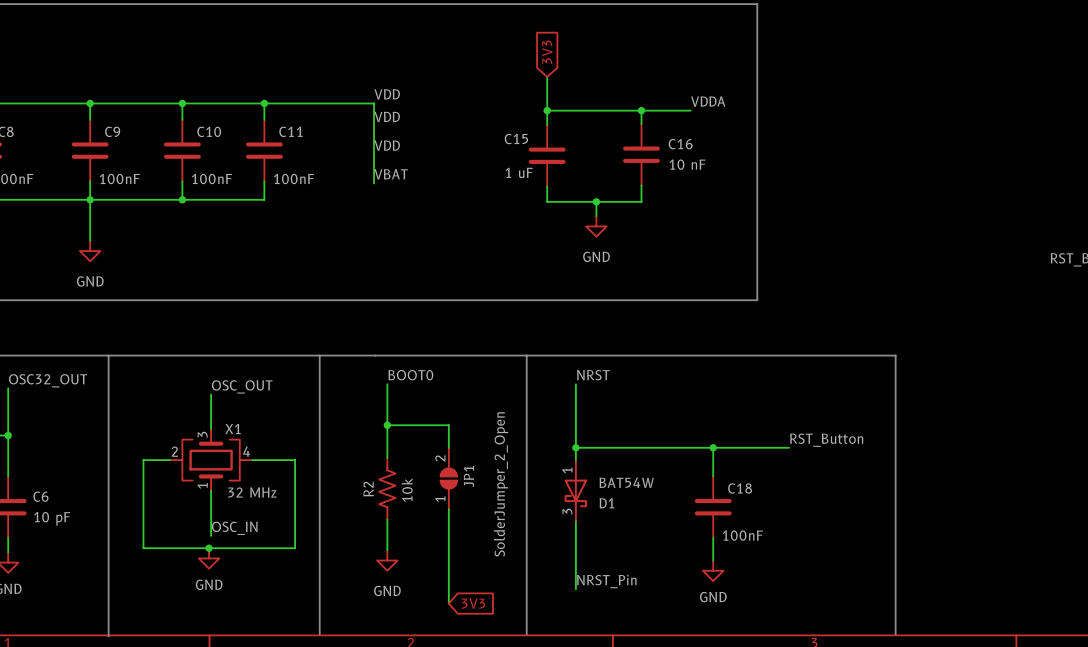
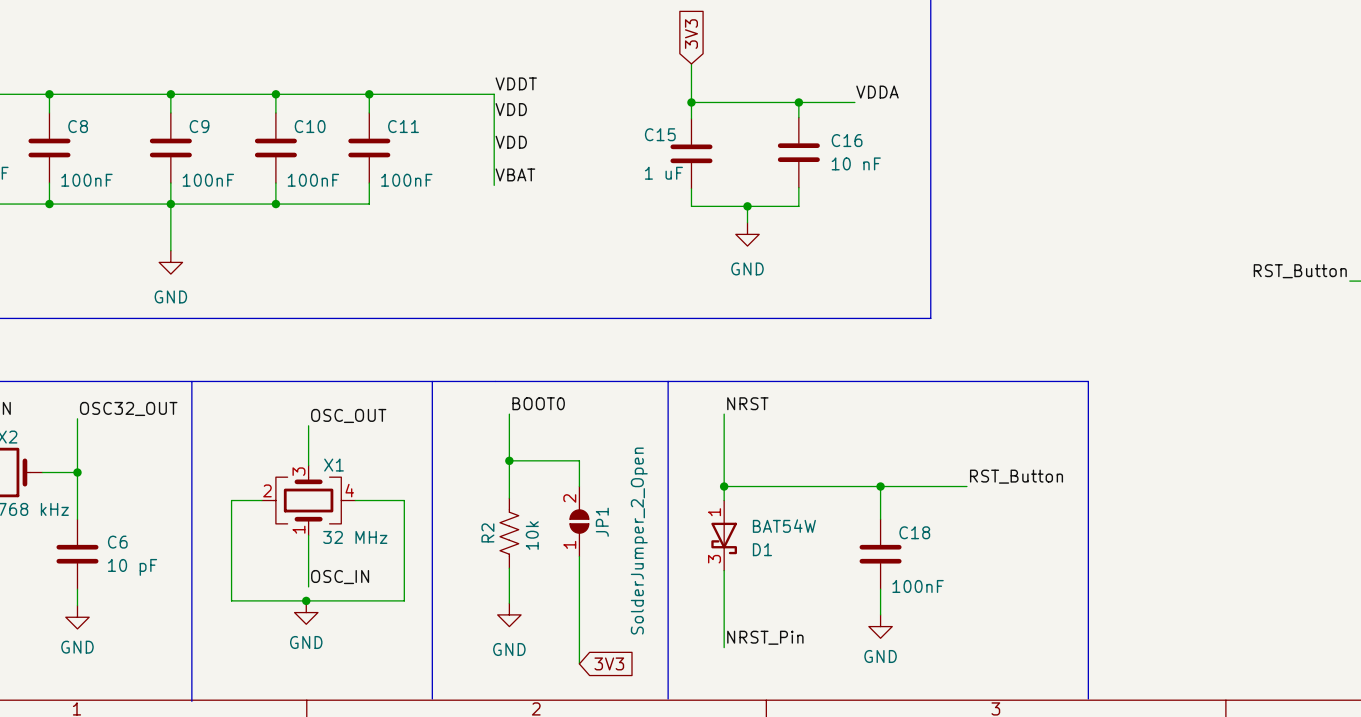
label: VDD (387, 94) -> VDDT (516, 83)

